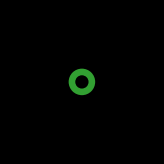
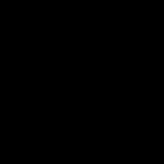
via: (81, 81) -> none

